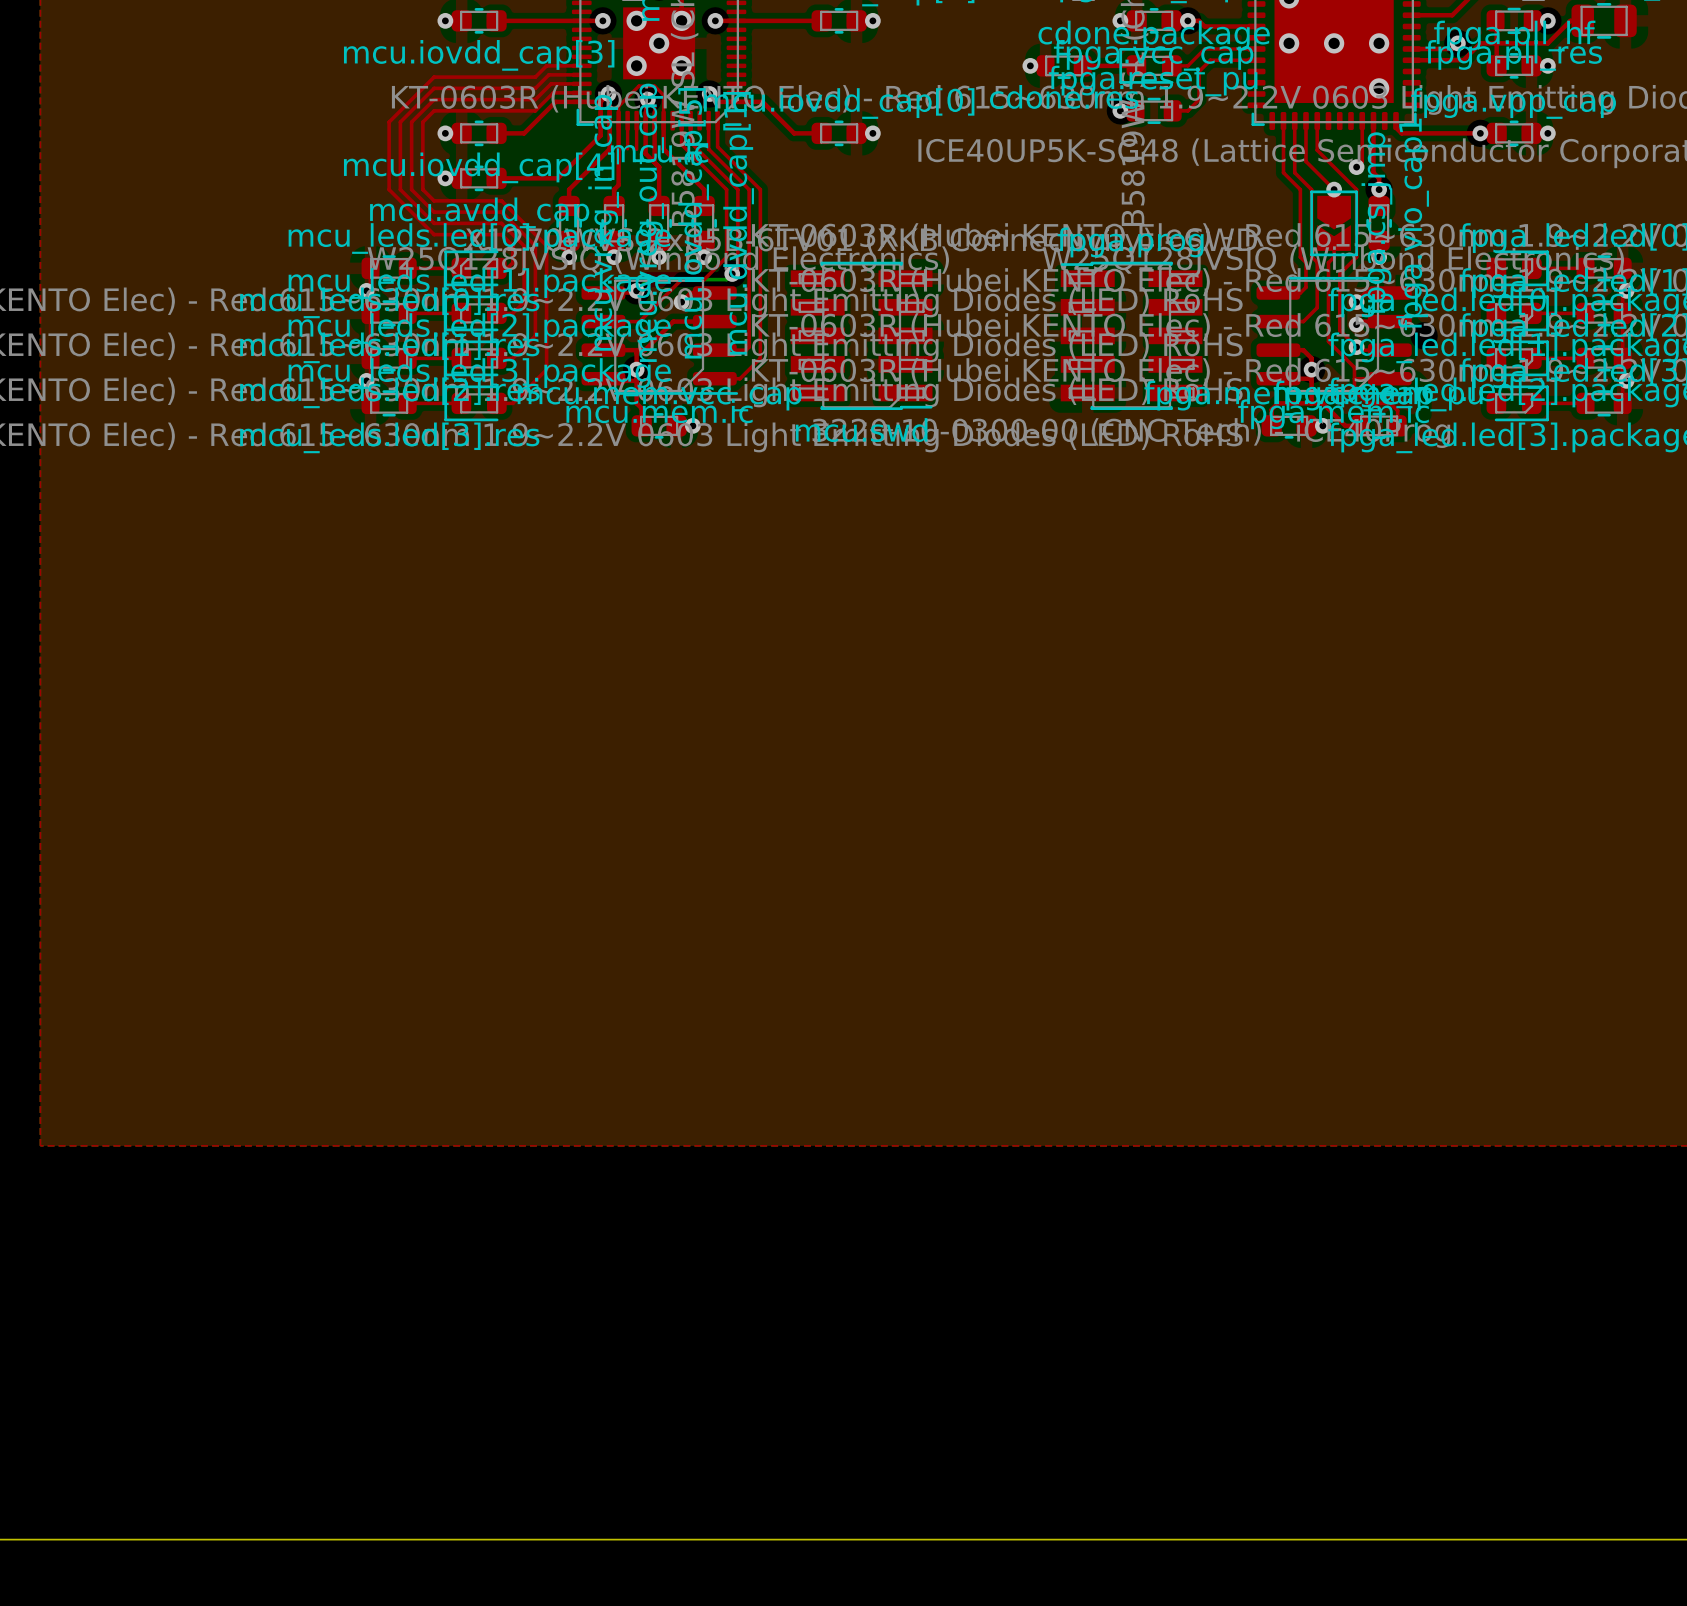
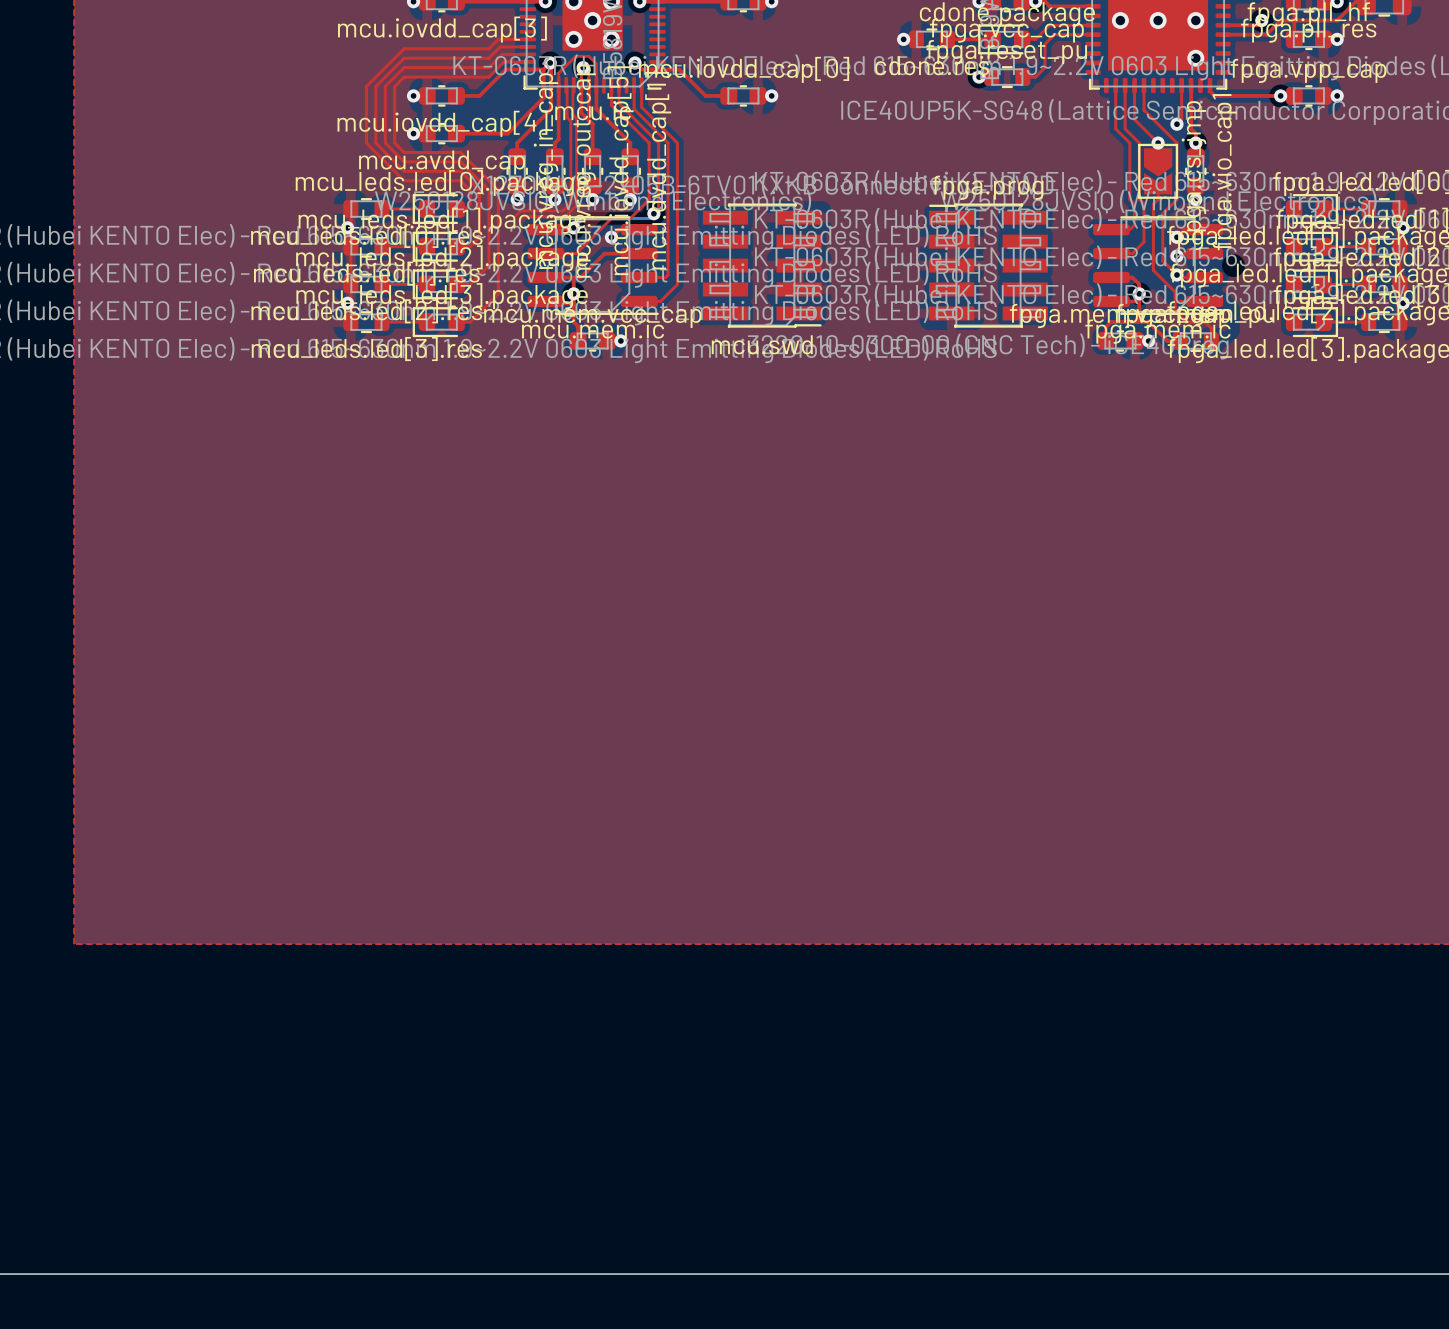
top track: (627, 120) (627, 148) -> (566, 85) (567, 117) (570, 121) (570, 199)
top track: (636, 120) (636, 149) -> (573, 85) (572, 114) (576, 118) (576, 205) (565, 216) (523, 216) (519, 220)
top track: none -> (570, 199) (570, 203) (563, 210) (520, 210) (515, 216)

